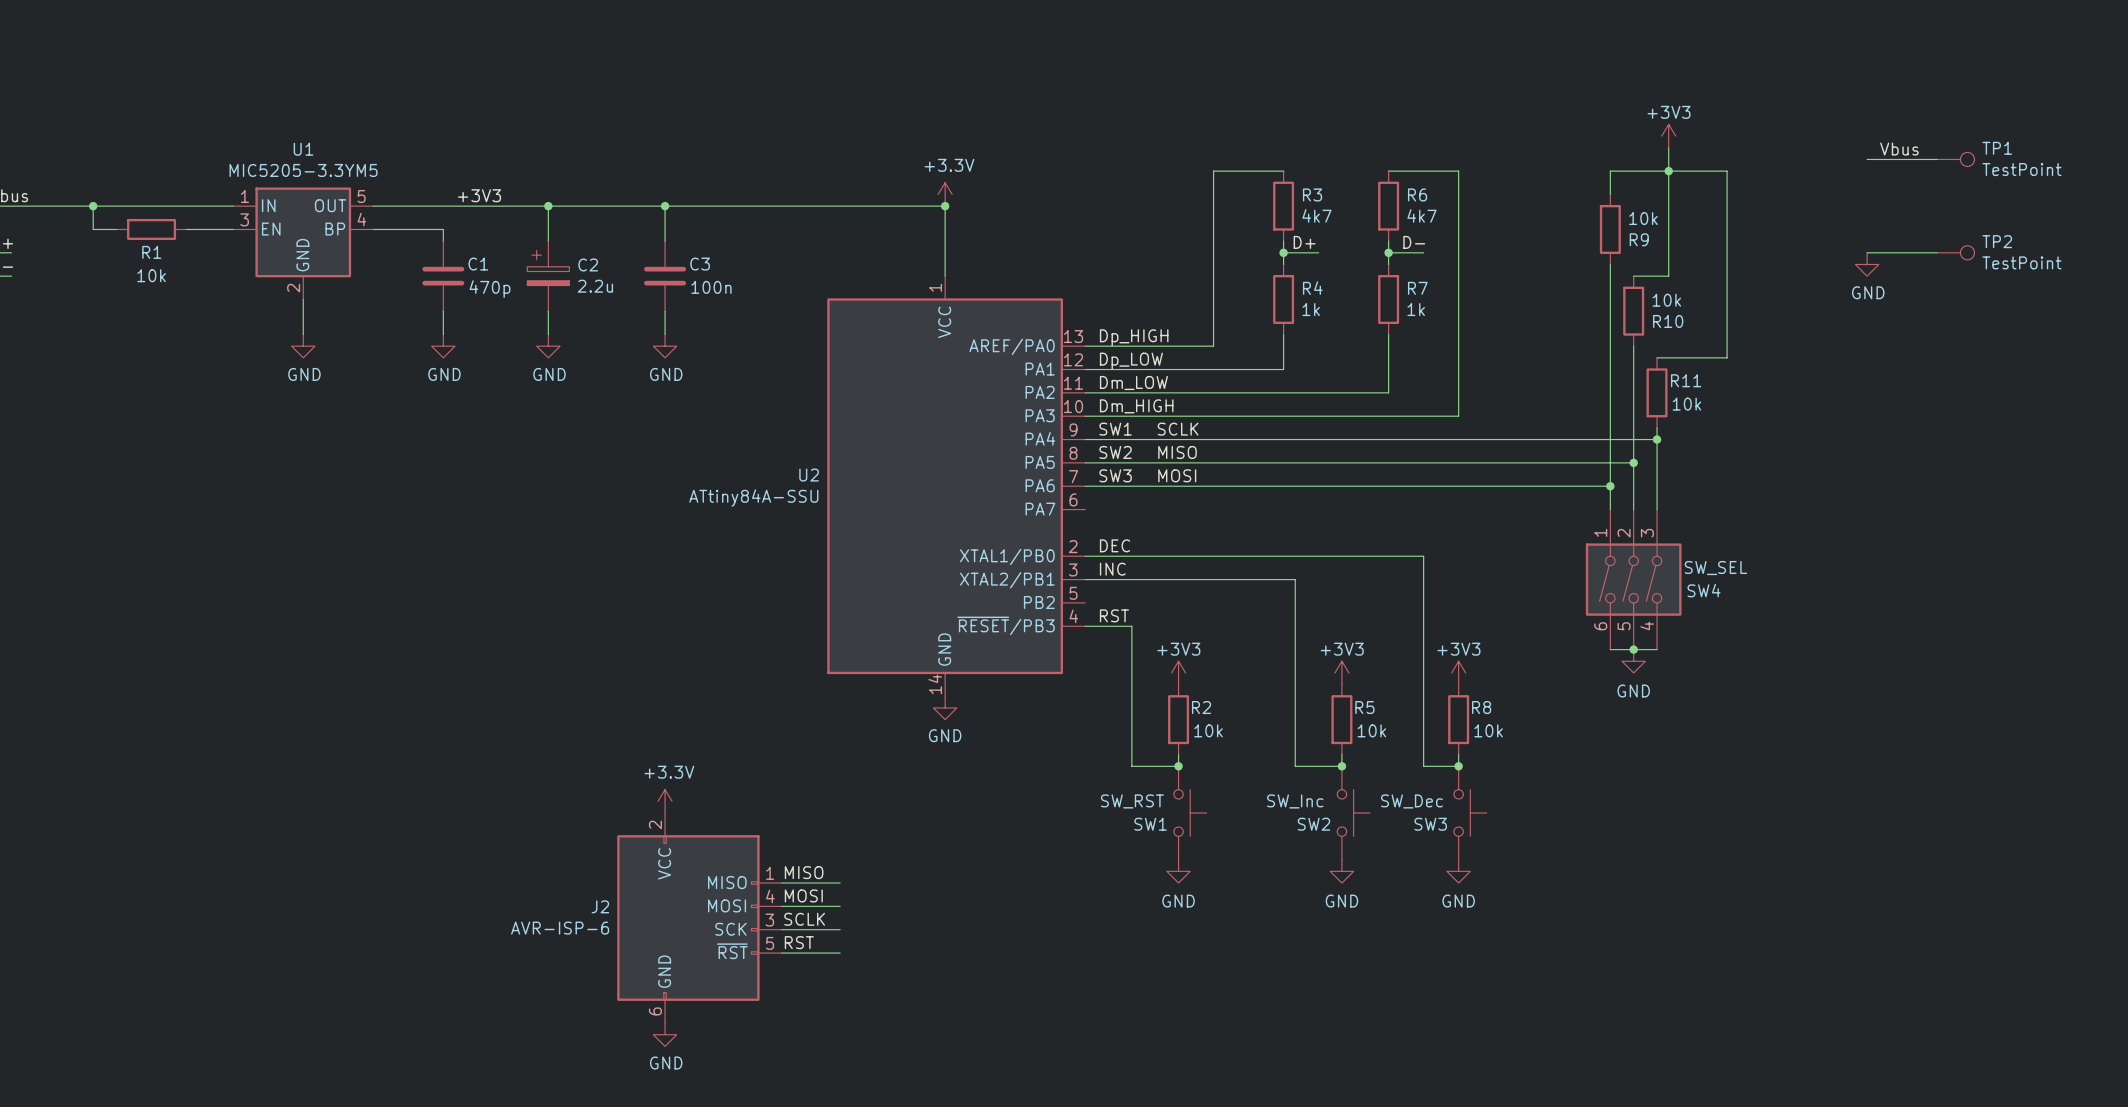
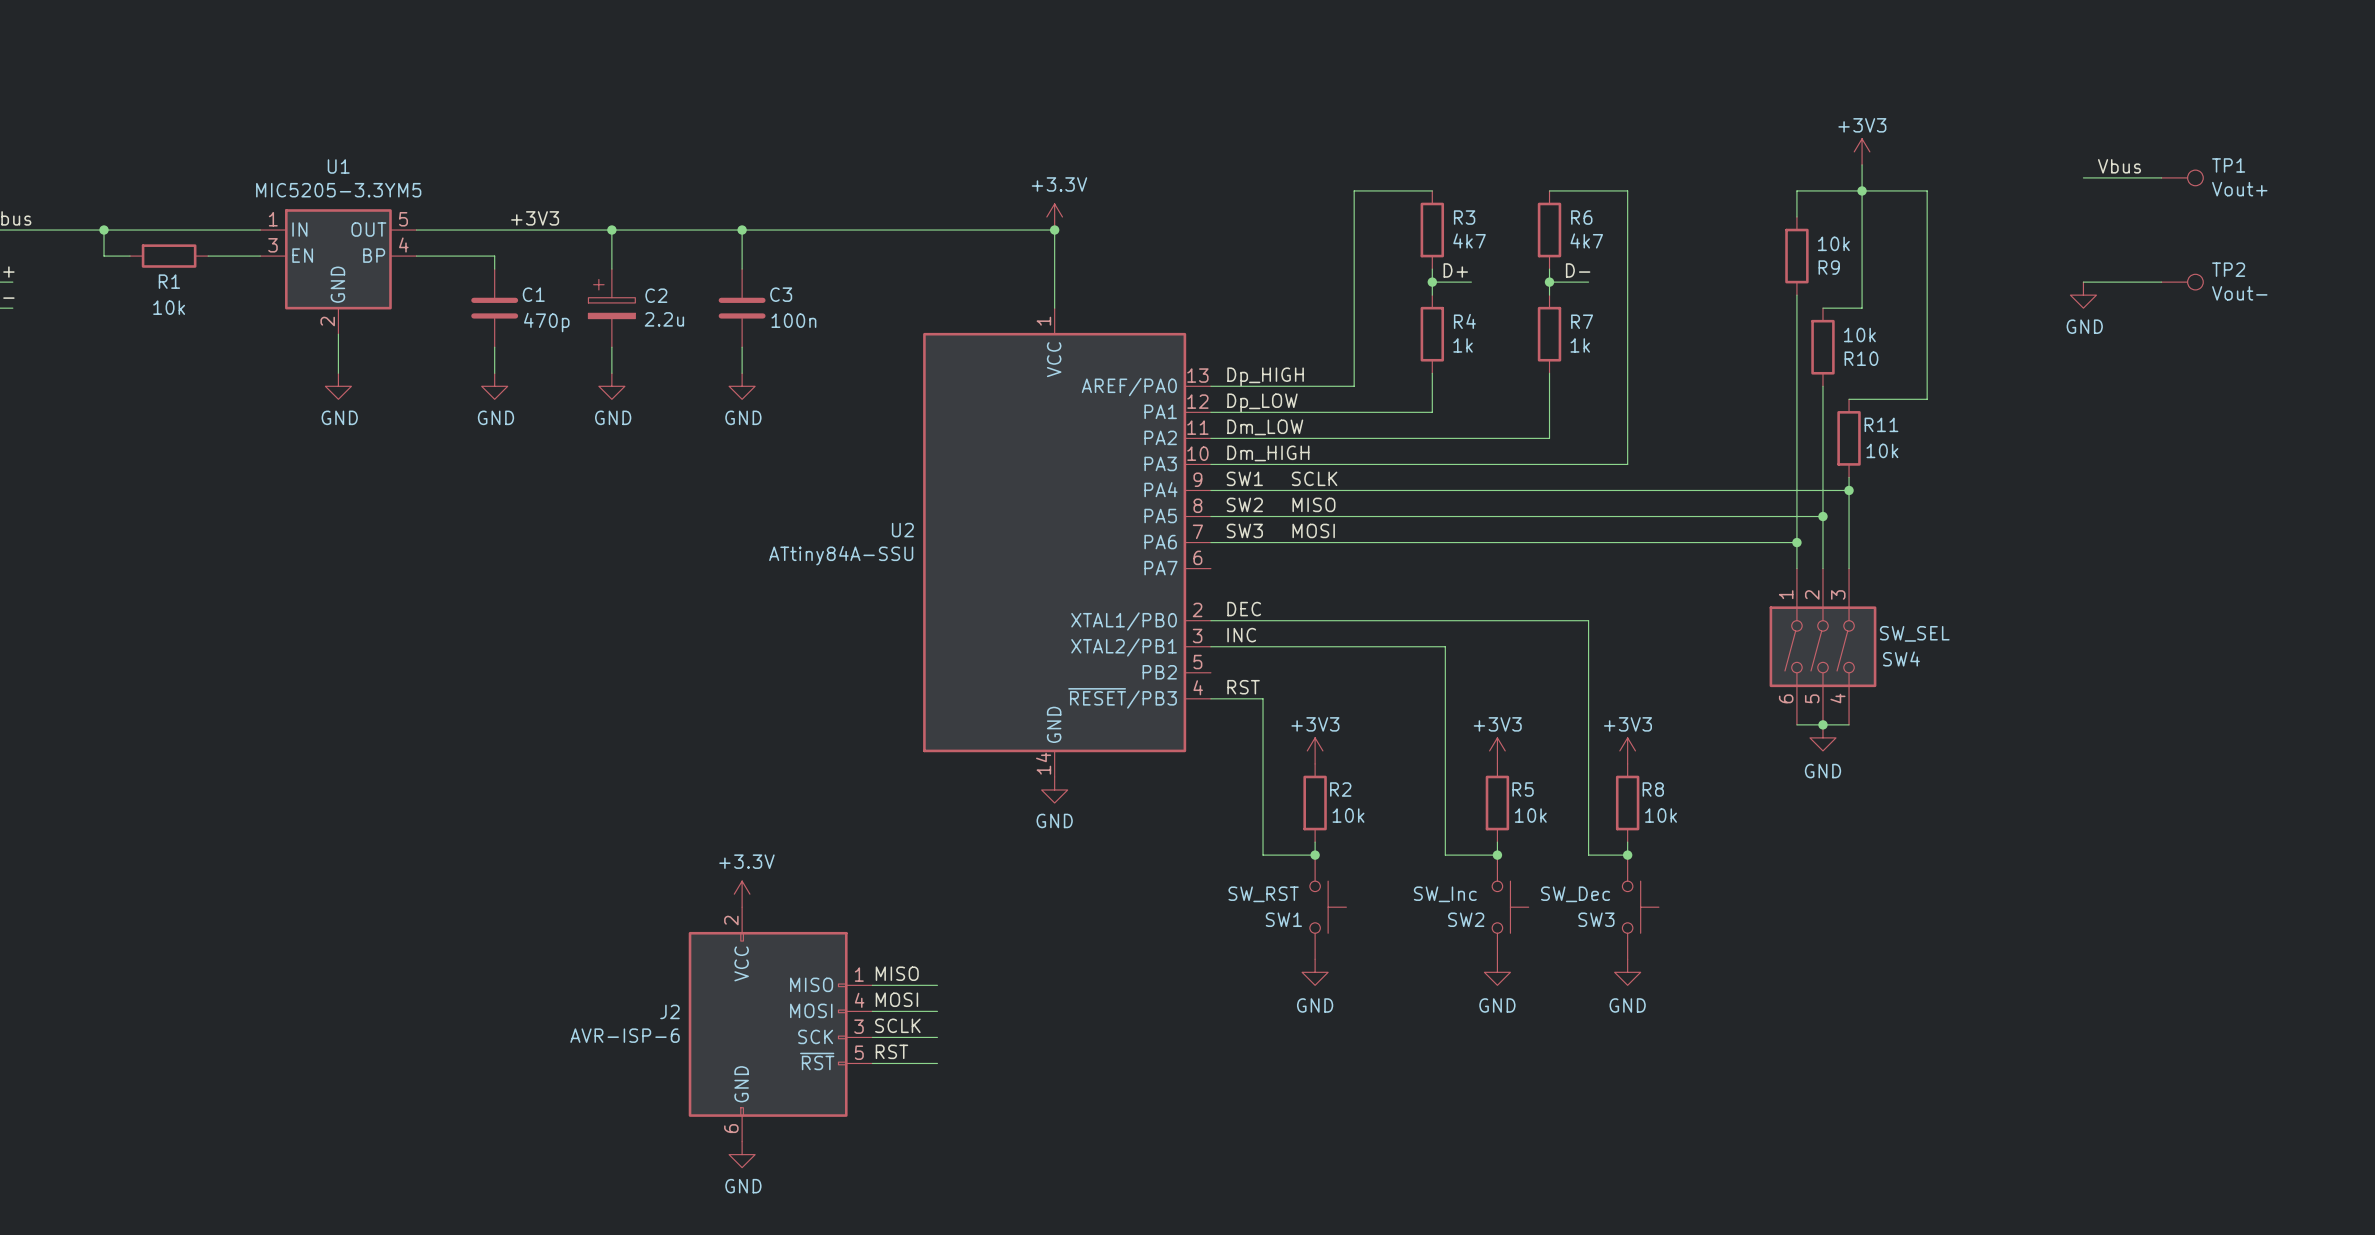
TP1 value: TestPoint (2021, 169) -> Vout+ (2239, 189)
TP2 value: TestPoint (2021, 262) -> Vout- (2239, 293)

